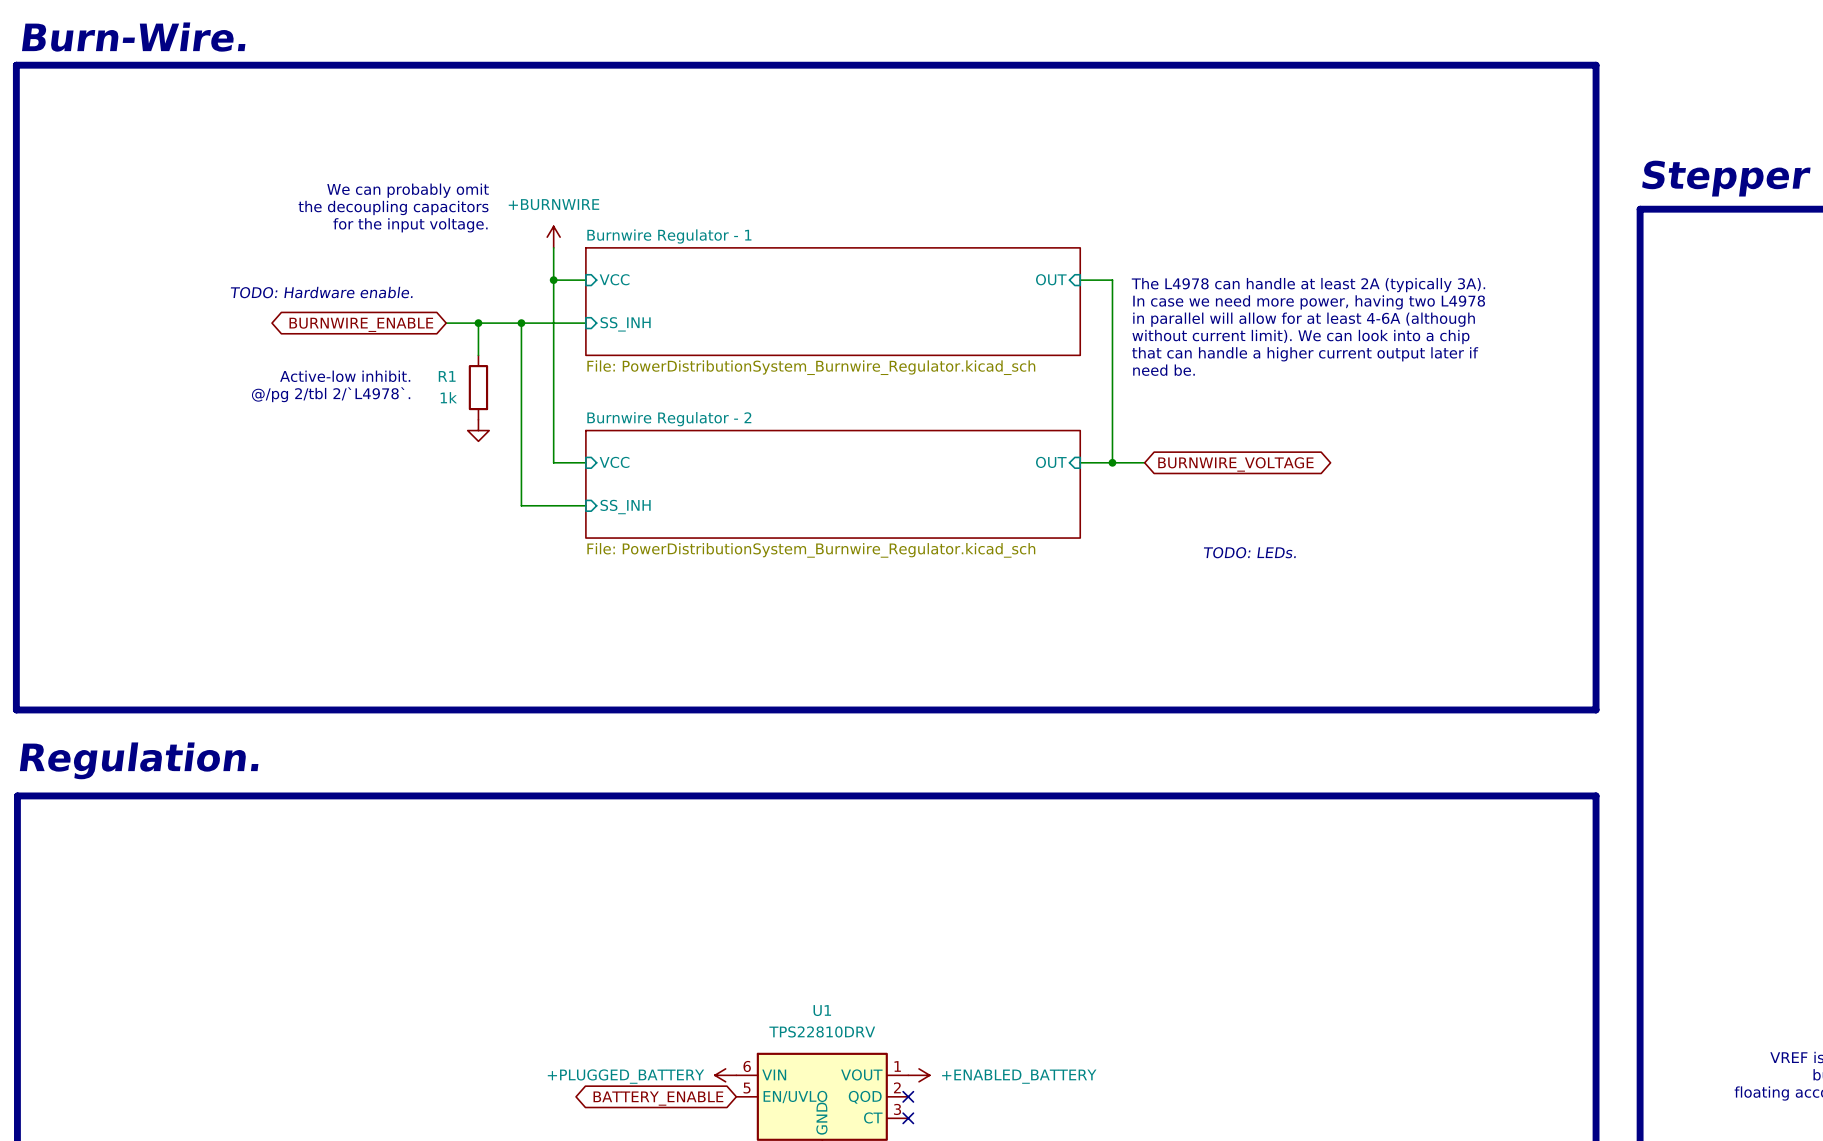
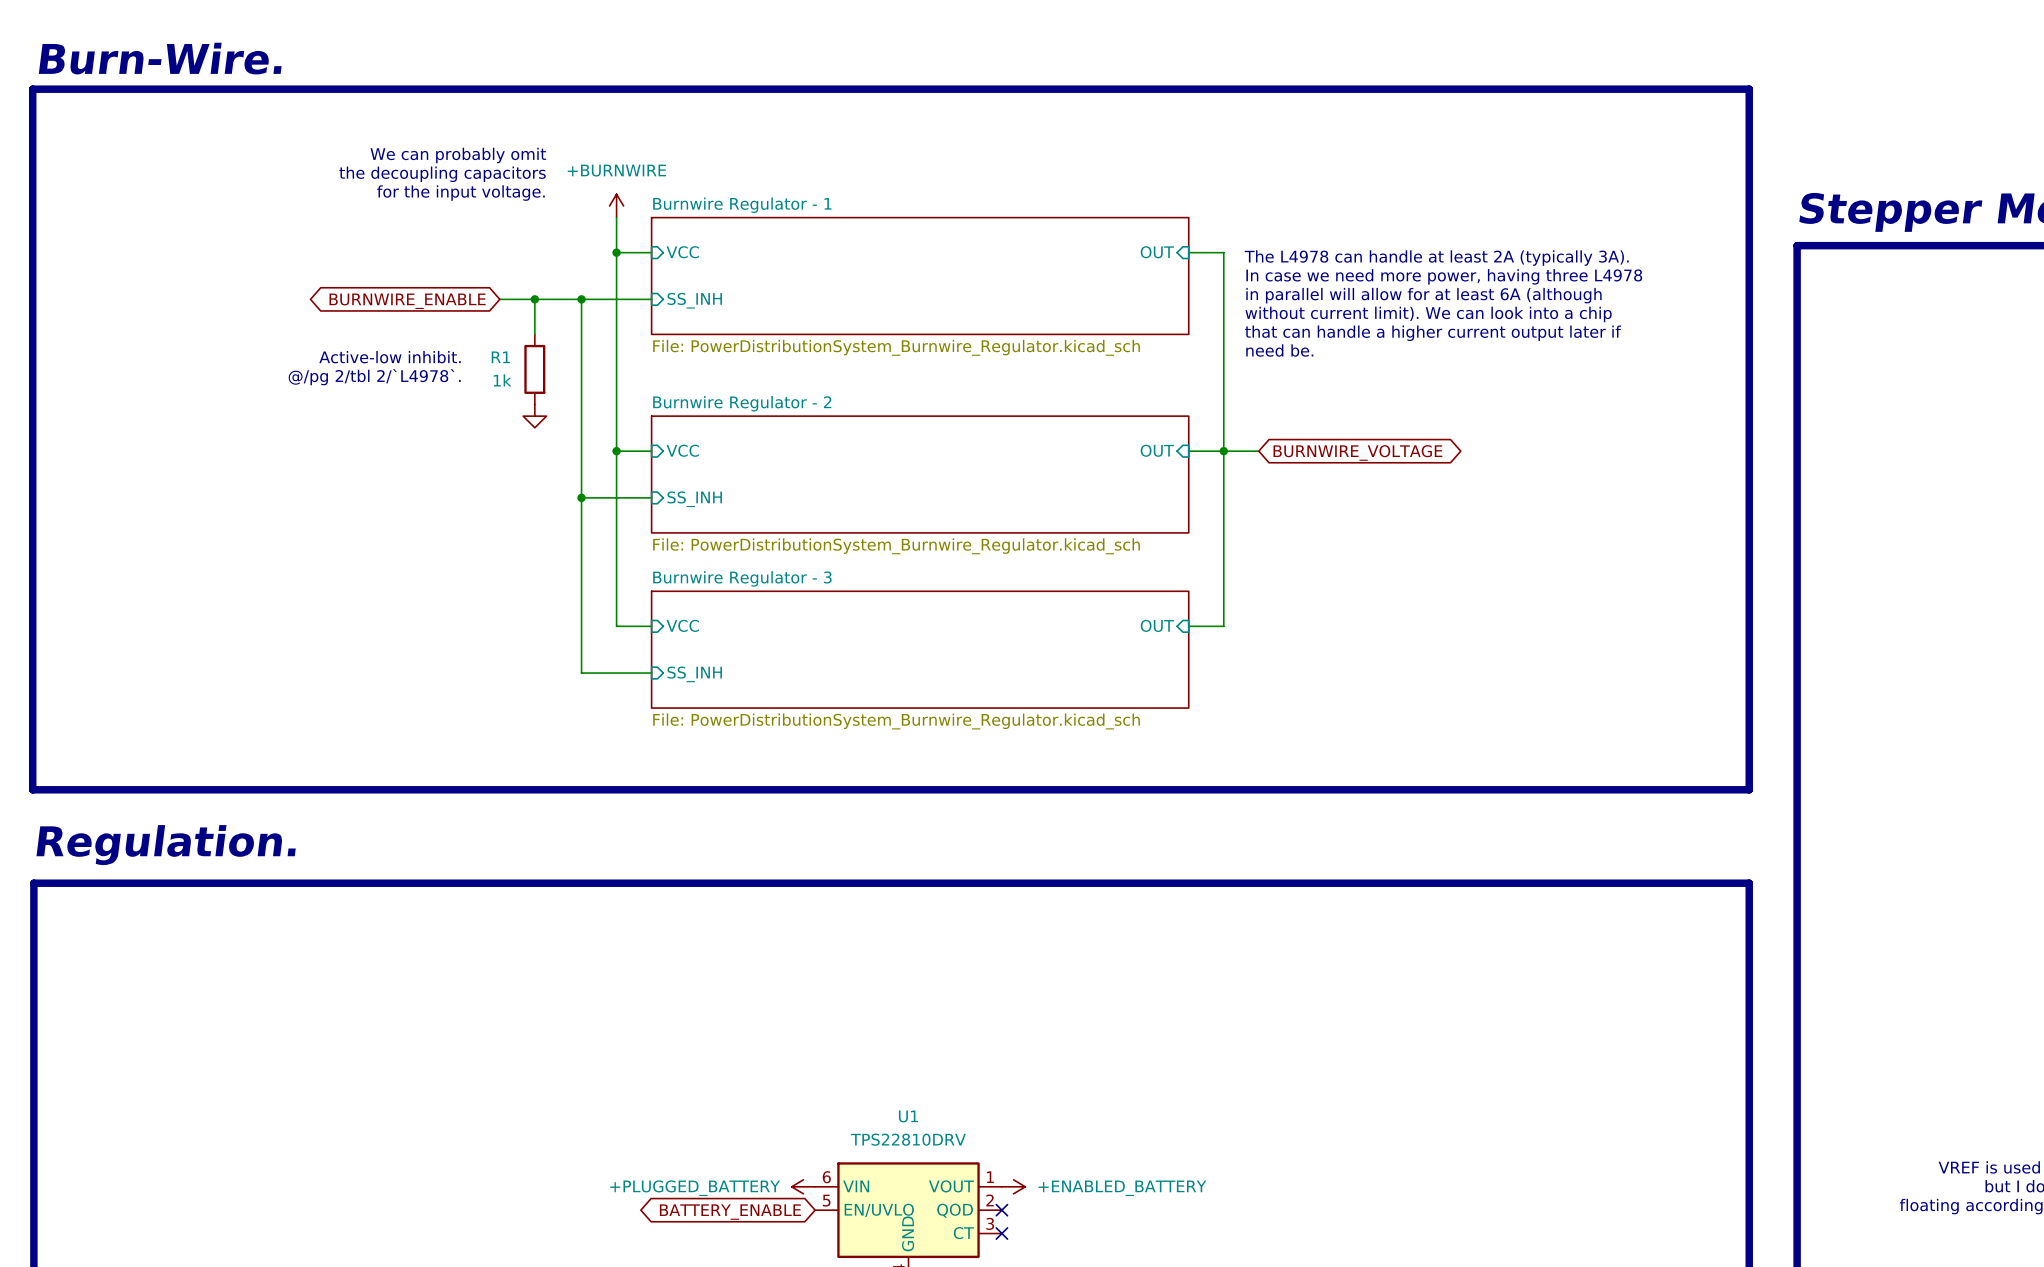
wire: none -> (616, 217) (616, 287)
text position: We can probably omit (408, 190) -> We can probably omit (458, 155)
text position: the decoupling capacitors (393, 207) -> the decoupling capacitors (442, 174)
junction: none -> (616, 252)
sheet pin: none -> VCC (682, 252)
sheet pin: none -> OUT (1157, 252)
text position: for the input voltage. (410, 225) -> for the input voltage. (460, 193)
power symbol position: +BURNWIRE (553, 237) -> +BURNWIRE (616, 205)
text: none -> In case we need more power, having three L4978 (1444, 276)
text: none -> in parallel will allow for at least 6A (although (1423, 295)
junction: none -> (534, 299)
wire: none -> (581, 299) (581, 369)
junction: none -> (581, 299)
sheet pin: none -> SS_INH (694, 300)
sheet pin: VCC (614, 279) -> none
sheet pin: OUT (1051, 279) -> none
wire: (553, 280) (585, 280) -> (616, 252) (651, 252)
junction: (553, 280) -> none
wire: (1080, 280) (1112, 280) -> (1188, 252) (1223, 252) (1223, 322)
text position: The L4978 can handle at least 2A (typically 3A). (1308, 285) -> The L4978 can handle at least 2A (typically 3A). (1436, 258)
text: TODO: Hardware enable. (321, 292) -> none
sheet Burnwire Regulator - 1 position: (833, 301) -> (920, 276)
text: In case we need more power, having two L4978 (1309, 302) -> none
text: in parallel will allow for at least 4-6A (although (1304, 319) -> none
wire: (446, 323) (585, 323) -> (499, 299) (651, 299)
wire: (478, 323) (478, 355) -> (534, 299) (534, 334)
junction: (478, 323) -> none
junction: (521, 323) -> none
global label position: BURNWIRE_ENABLE (361, 324) -> BURNWIRE_ENABLE (407, 301)
sheet pin: SS_INH (625, 324) -> none
text position: without current limit). We can look into a chip (1300, 336) -> without current limit). We can look into a chip (1428, 314)
text position: that can handle a higher current output later if (1305, 354) -> that can handle a higher current output later if (1433, 333)
text position: need be. (1164, 370) -> need be. (1279, 350)
text position: Active-low inhibit. (345, 376) -> Active-low inhibit. (390, 357)
R1 position: (478, 387) -> (534, 369)
text position: @/pg 2/tbl 2/`L4978`. (331, 394) -> @/pg 2/tbl 2/`L4978`. (374, 377)
sheet pin: none -> VCC (682, 450)
sheet pin: none -> OUT (1157, 450)
wire: none -> (616, 451) (651, 451)
junction: none -> (616, 451)
junction: none -> (1223, 451)
power symbol position: (478, 430) -> (534, 416)
wire: none -> (581, 497) (651, 497)
junction: none -> (581, 497)
sheet pin: none -> SS_INH (694, 499)
wire: (553, 462) (585, 462) -> (616, 521) (616, 626) (651, 626)
sheet pin: VCC (614, 462) -> none
sheet pin: OUT (1051, 462) -> none
wire: (1080, 462) (1144, 462) -> (1188, 451) (1258, 451)
wire: none -> (1223, 521) (1223, 626) (1188, 626)
junction: (1112, 462) -> none
global label position: BURNWIRE_VOLTAGE (1235, 464) -> BURNWIRE_VOLTAGE (1357, 452)
sheet Burnwire Regulator - 2 position: (833, 484) -> (920, 474)
wire: (521, 505) (585, 505) -> (581, 567) (581, 673) (651, 673)
sheet pin: SS_INH (625, 507) -> none
text: TODO: LEDs. (1249, 552) -> none
sheet pin: none -> VCC (682, 625)
sheet pin: none -> OUT (1157, 625)
sheet Burnwire Regulator - 3: none -> File: PowerDistributionSystem_Burnwire_Regulator.kicad_sch (920, 649)
sheet pin: none -> SS_INH (694, 674)

